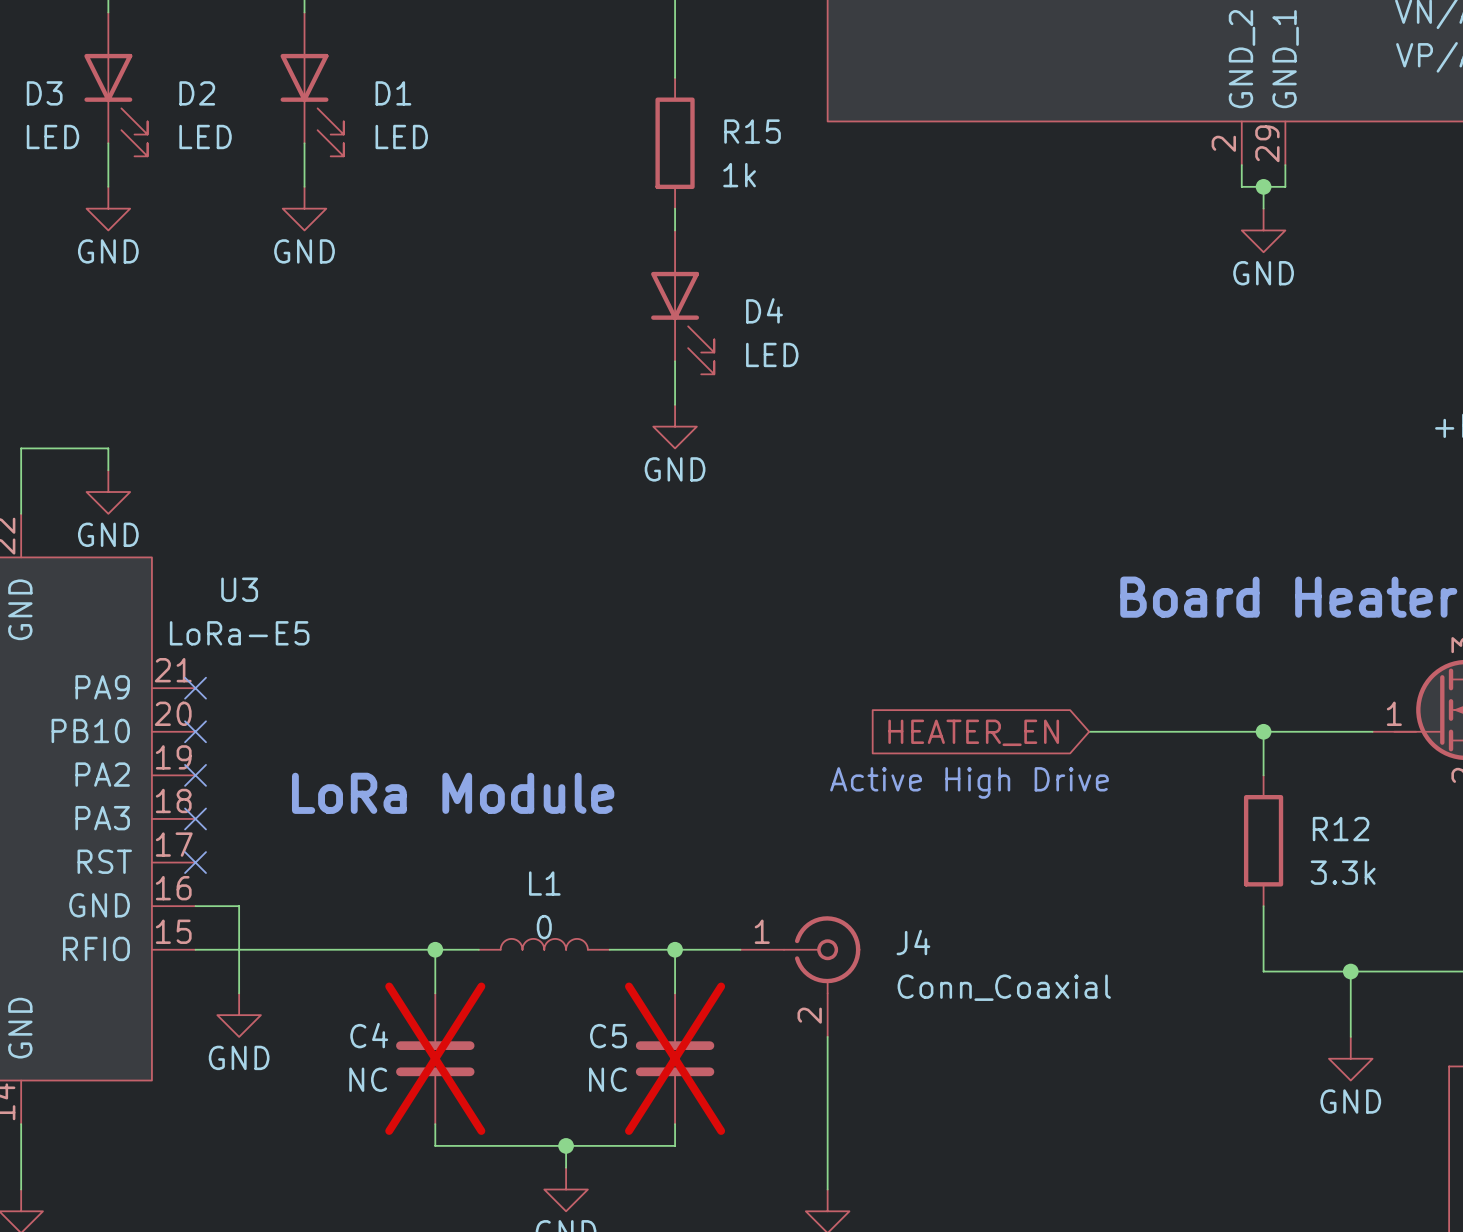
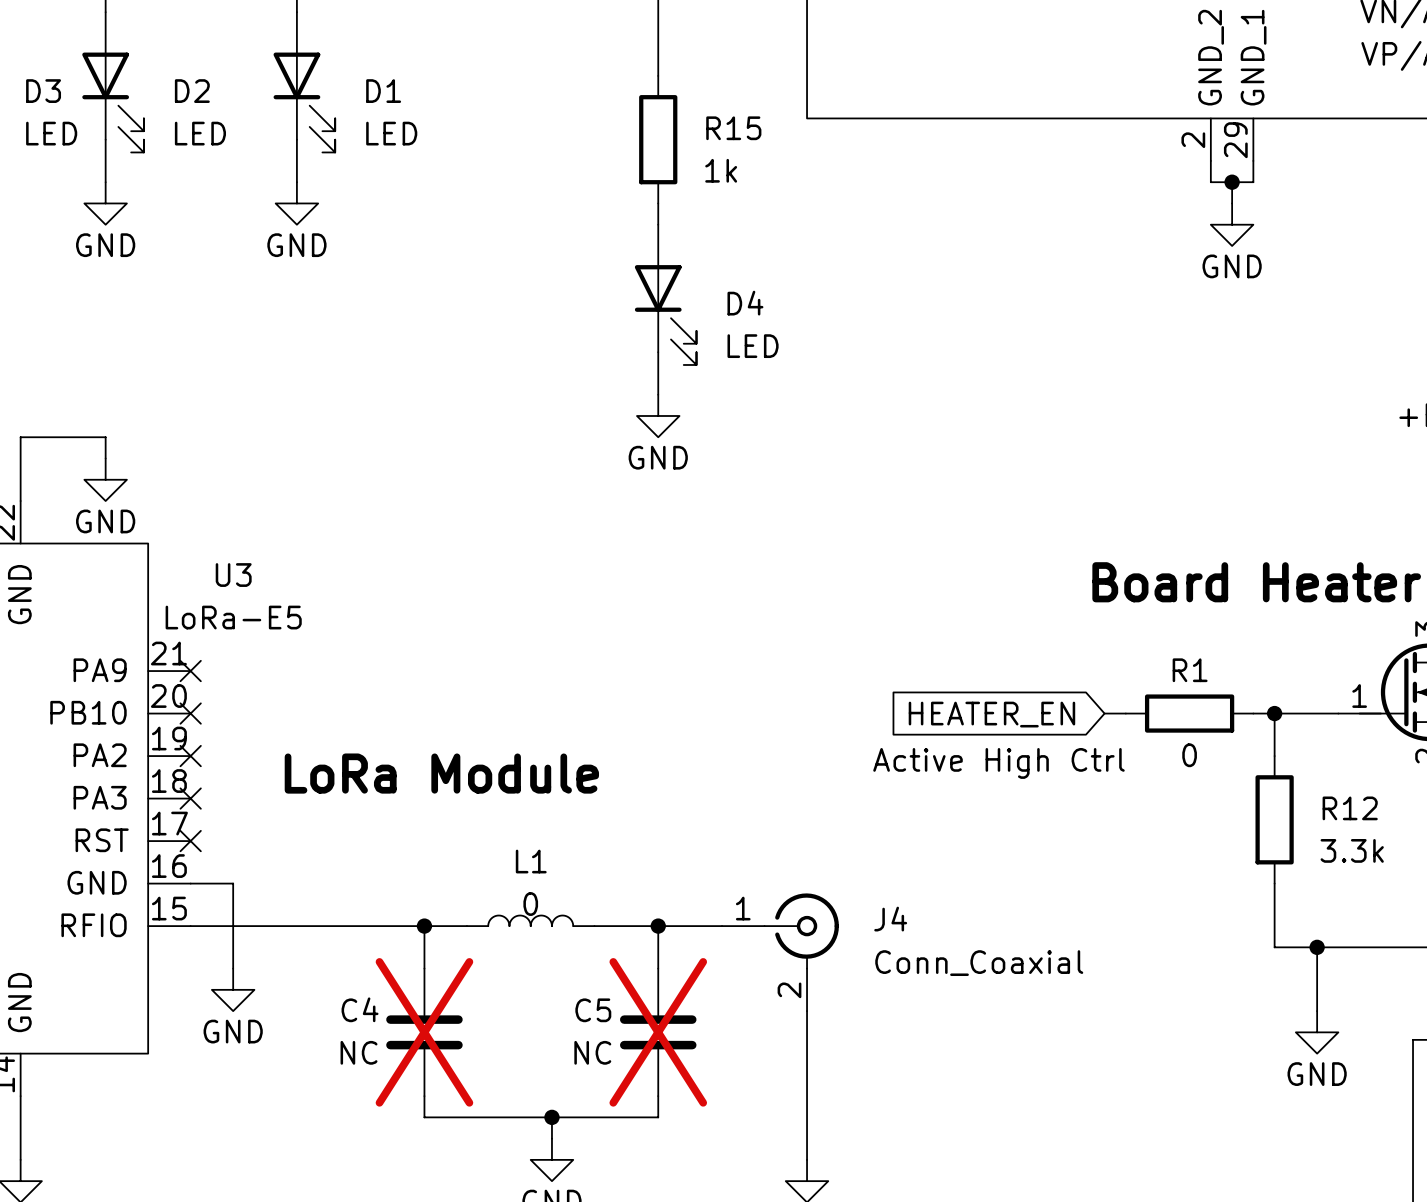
wire: (1089, 731) (1132, 731) -> none
wire: (1154, 731) (1285, 731) -> none
R1: none -> 0 (1189, 713)
wire: (1263, 731) (1263, 775) -> (1274, 713) (1274, 756)
junction position: (1263, 731) -> (1274, 713)
global label position: HEATER_EN (973, 732) -> HEATER_EN (991, 714)
text: Active High Drive (969, 782) -> Active High Ctrl (998, 763)
R12 position: (1263, 840) -> (1274, 819)
wire: (1263, 906) (1263, 971) (1307, 971) -> (1274, 883) (1274, 947)

